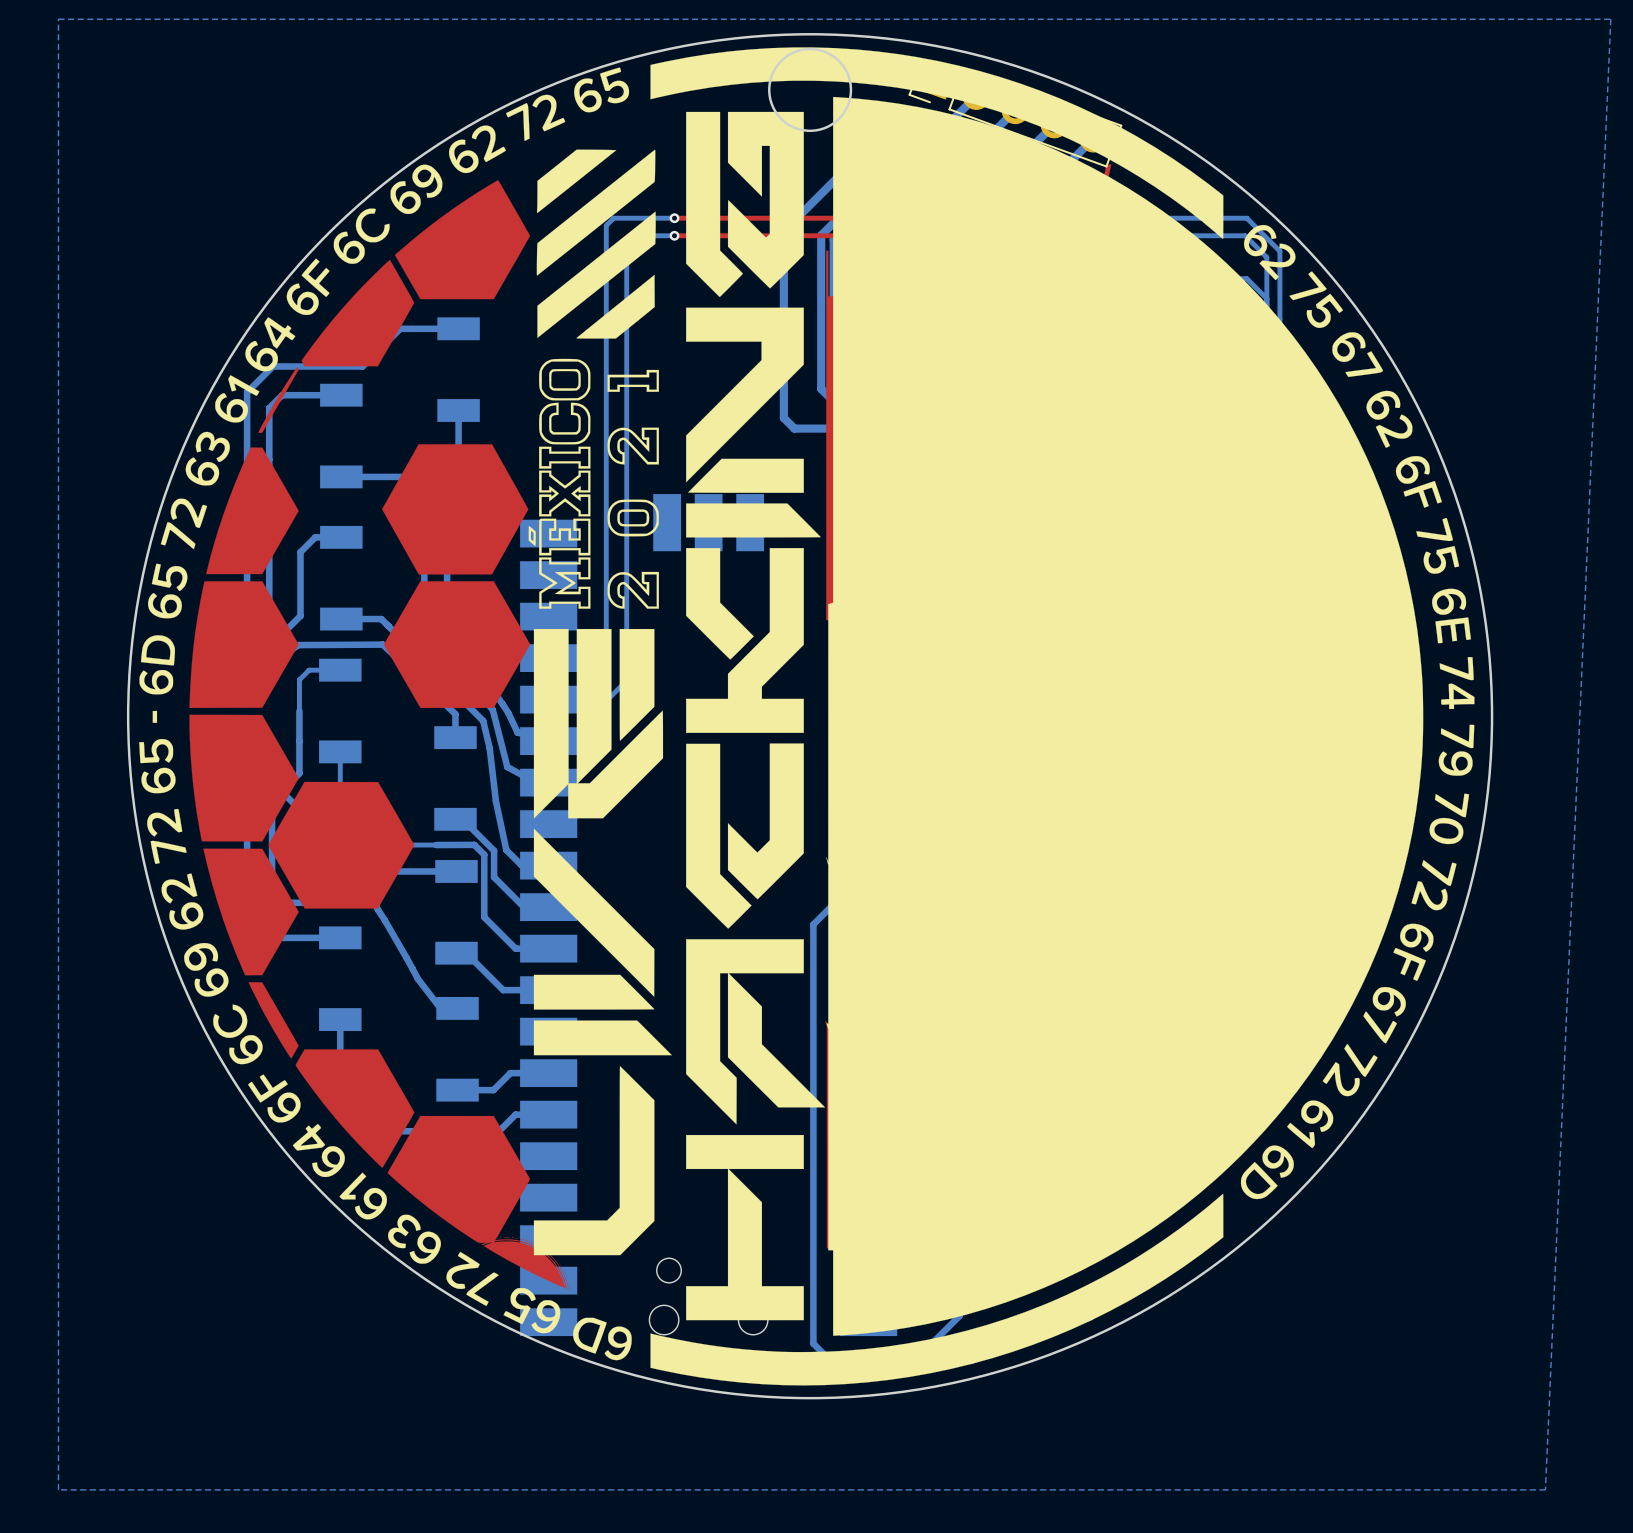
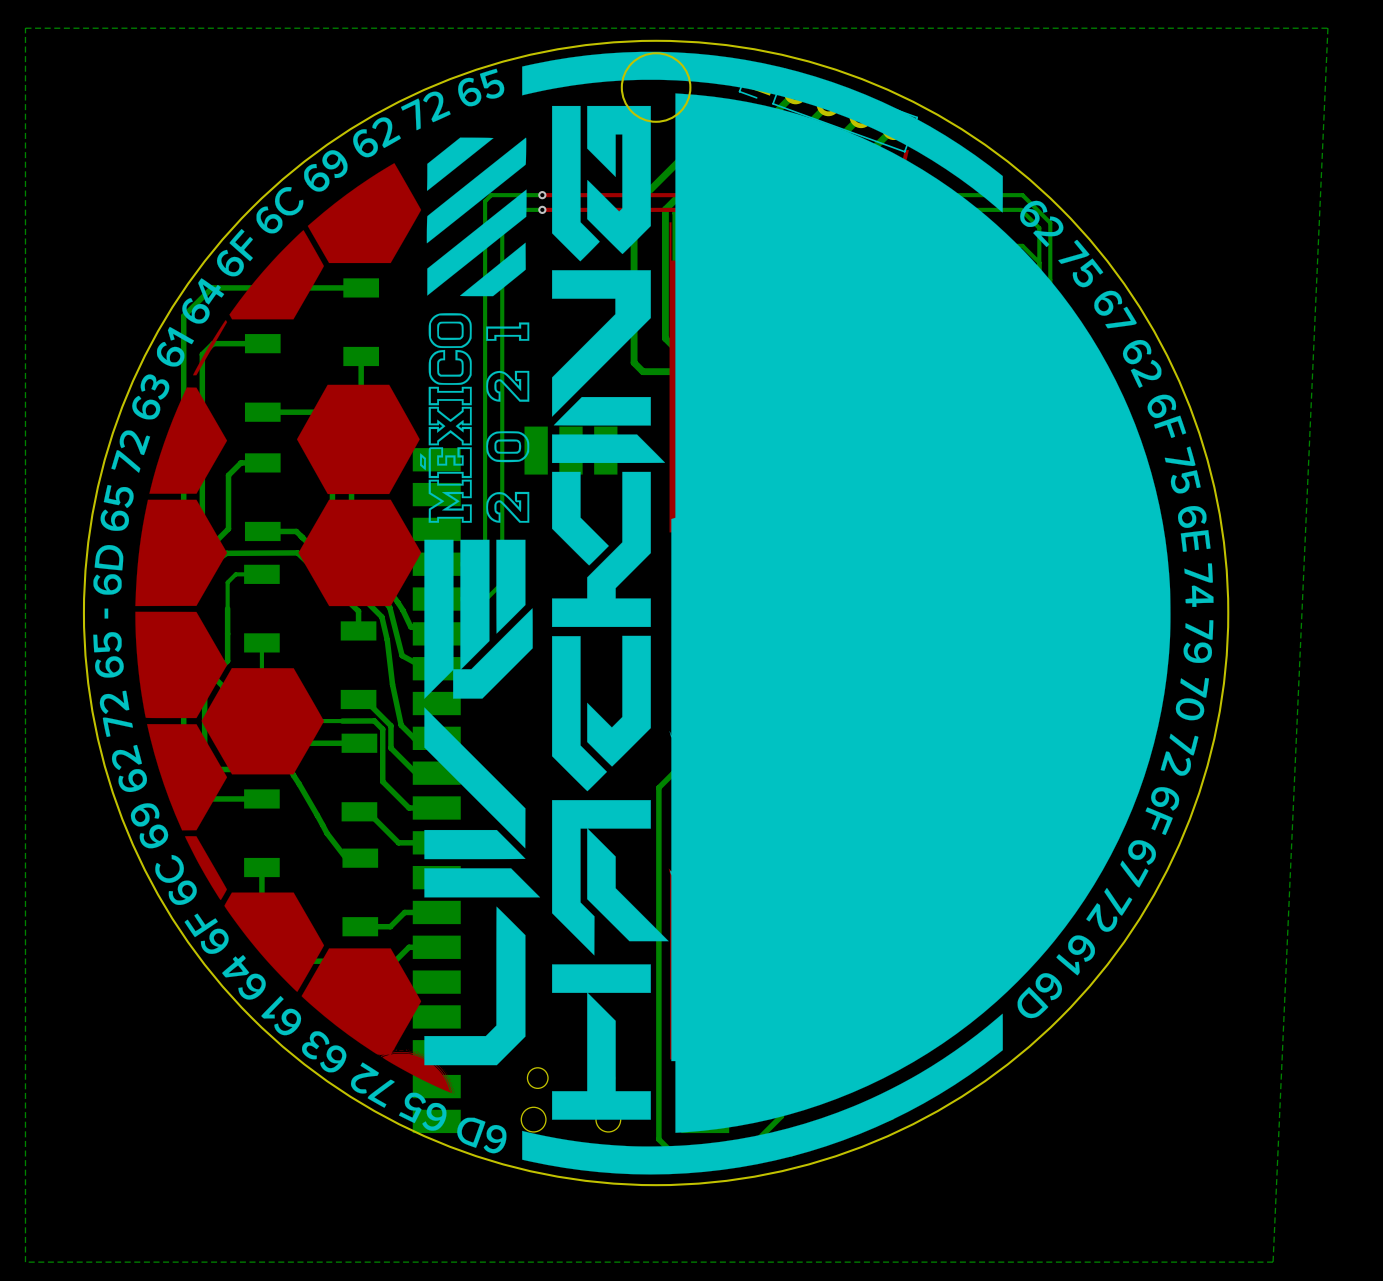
bottom track: (400, 328) (362, 366) (272, 366) (247, 392) -> (312, 287) (212, 287) (183, 316) (183, 341)

